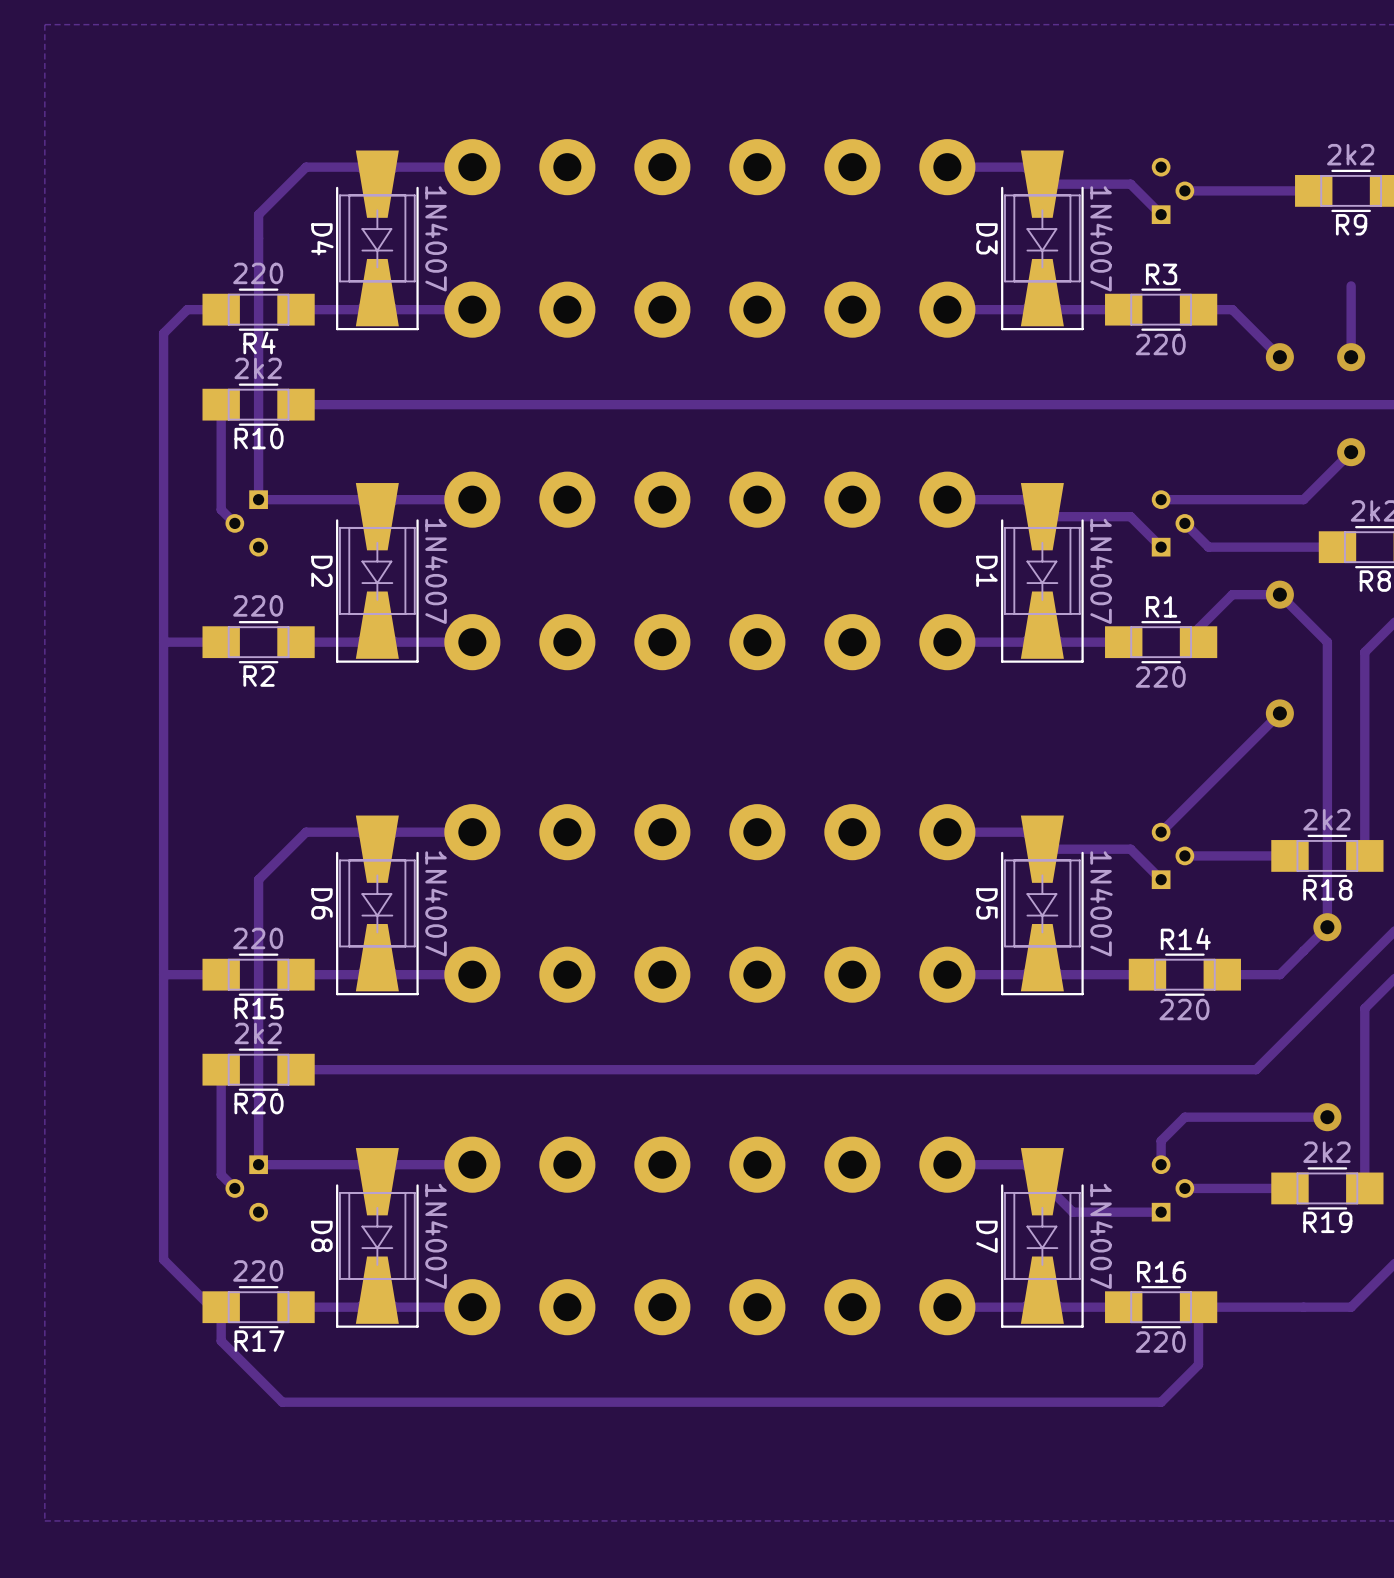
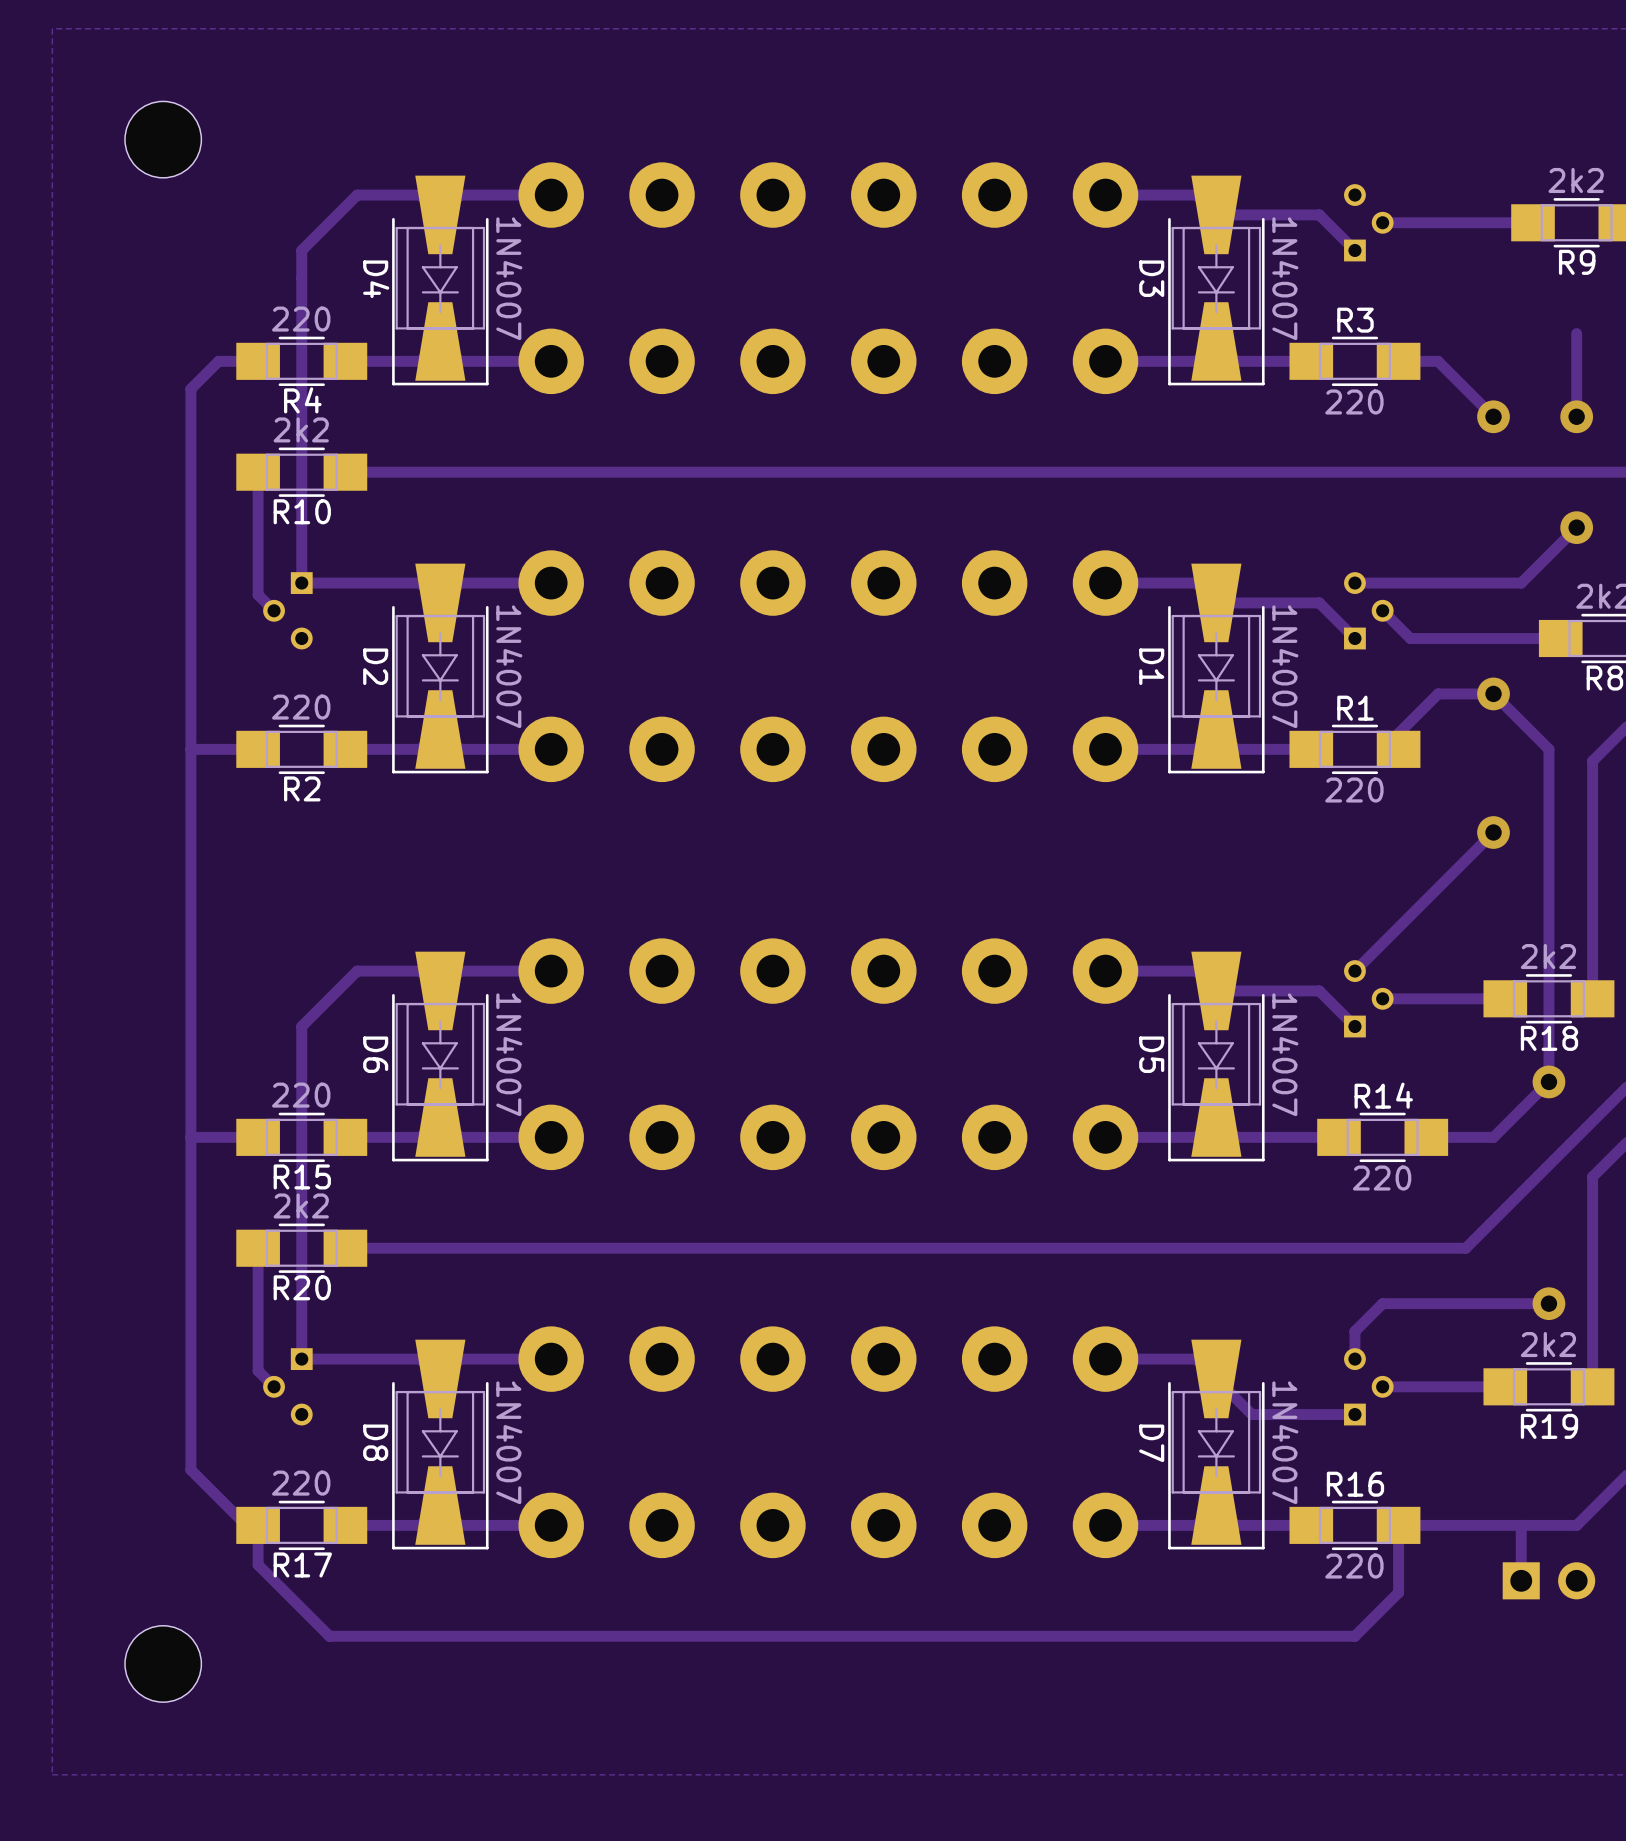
part: none -> (163, 139)
track: none -> (1521, 1525) (1521, 1580)
part: none -> (1548, 1580)
part: none -> (163, 1663)

